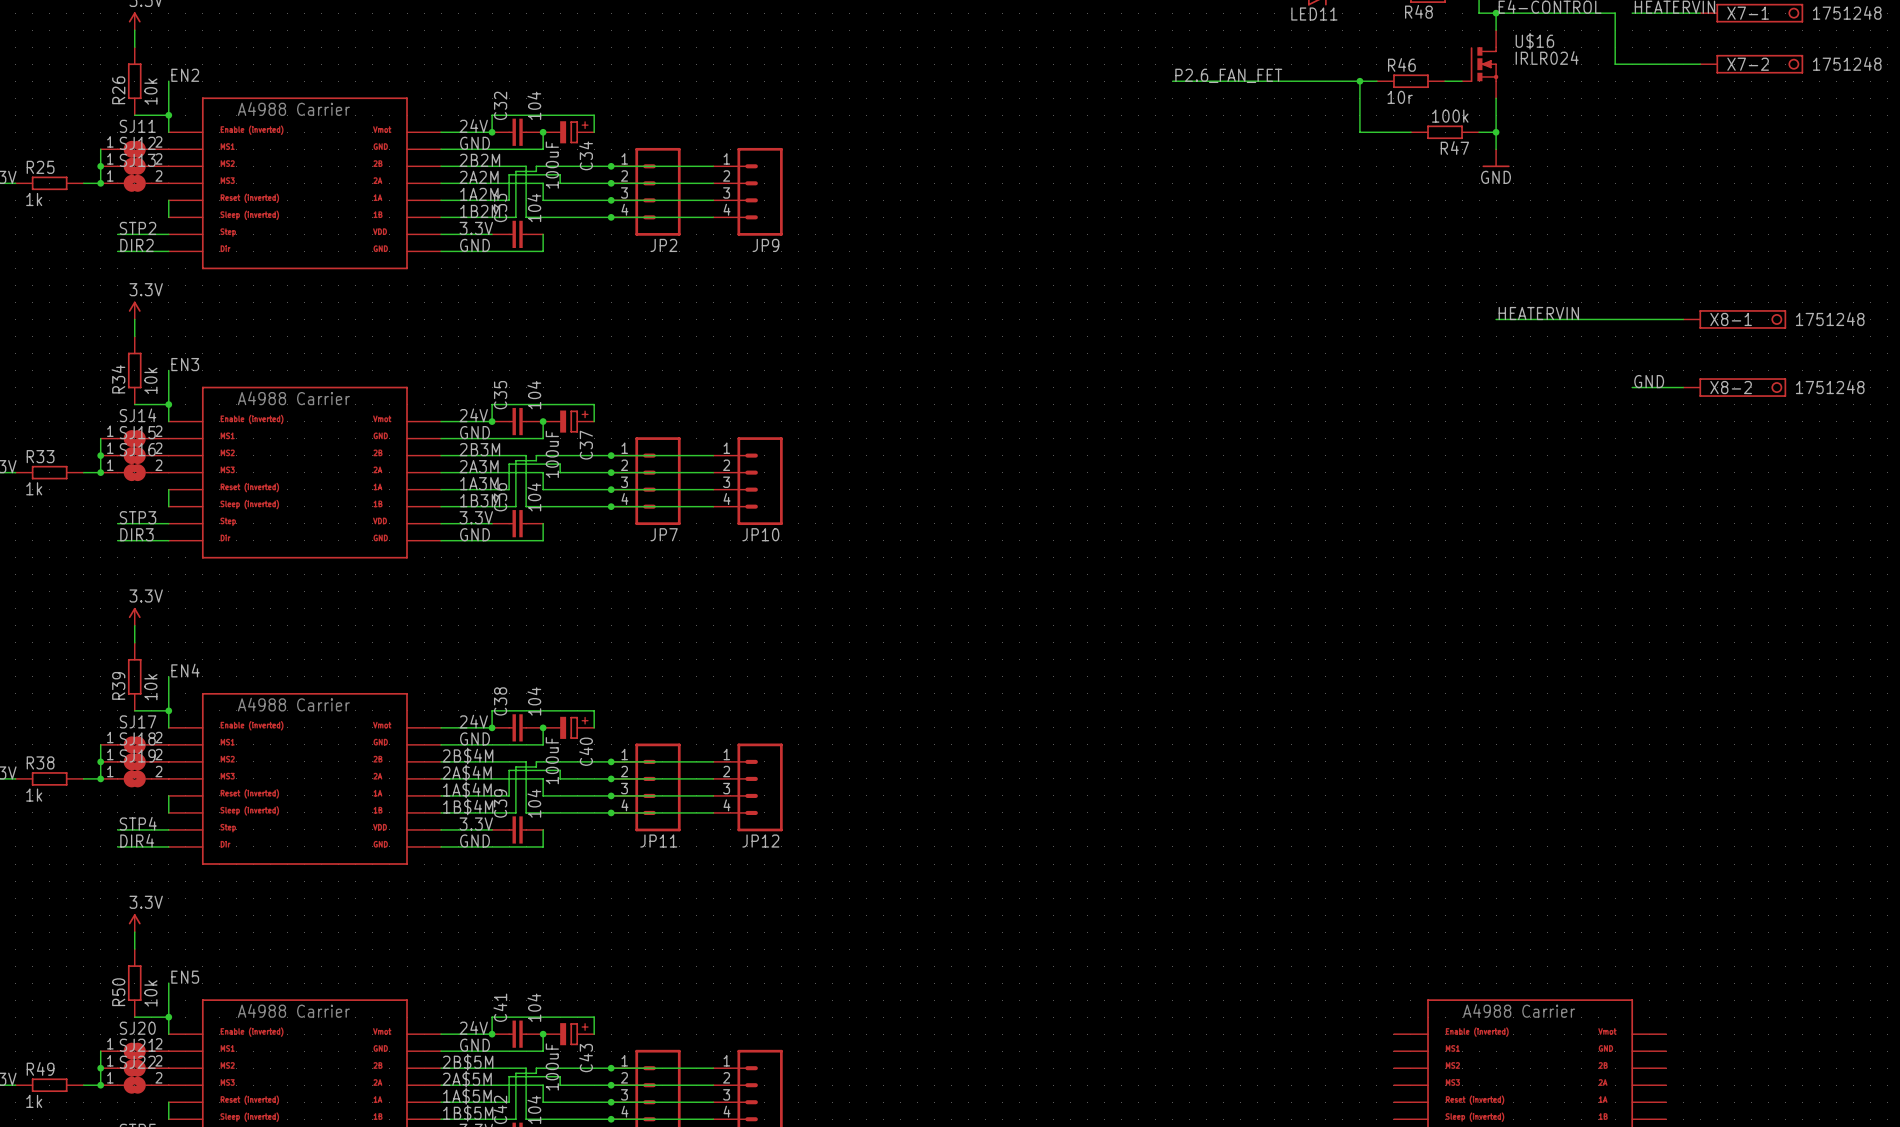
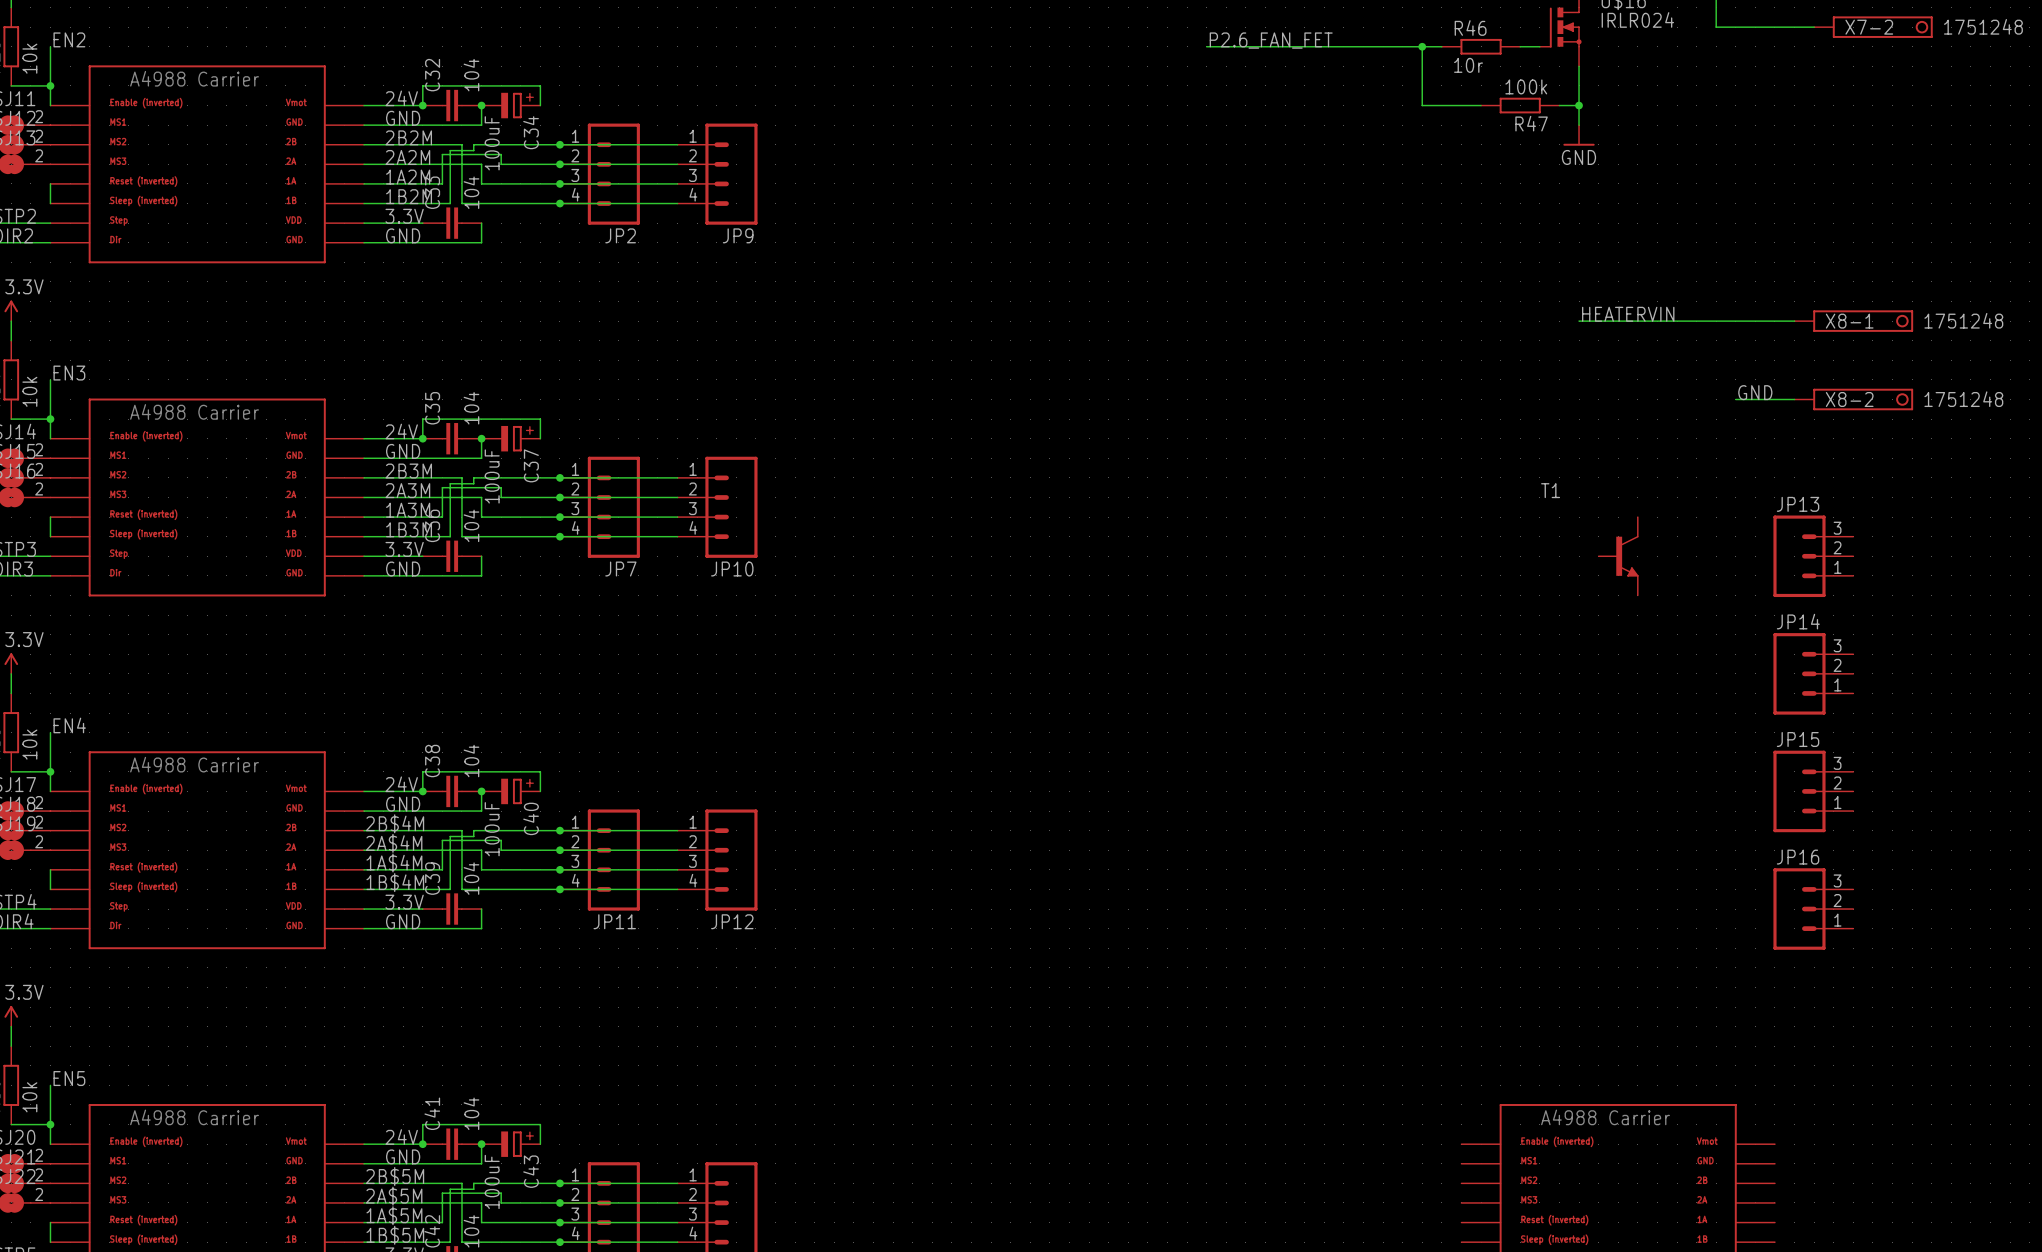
T1: none -> (1618, 556)
JP13: none -> (1813, 556)
JP14: none -> (1813, 673)
JP15: none -> (1813, 791)
JP16: none -> (1813, 909)

